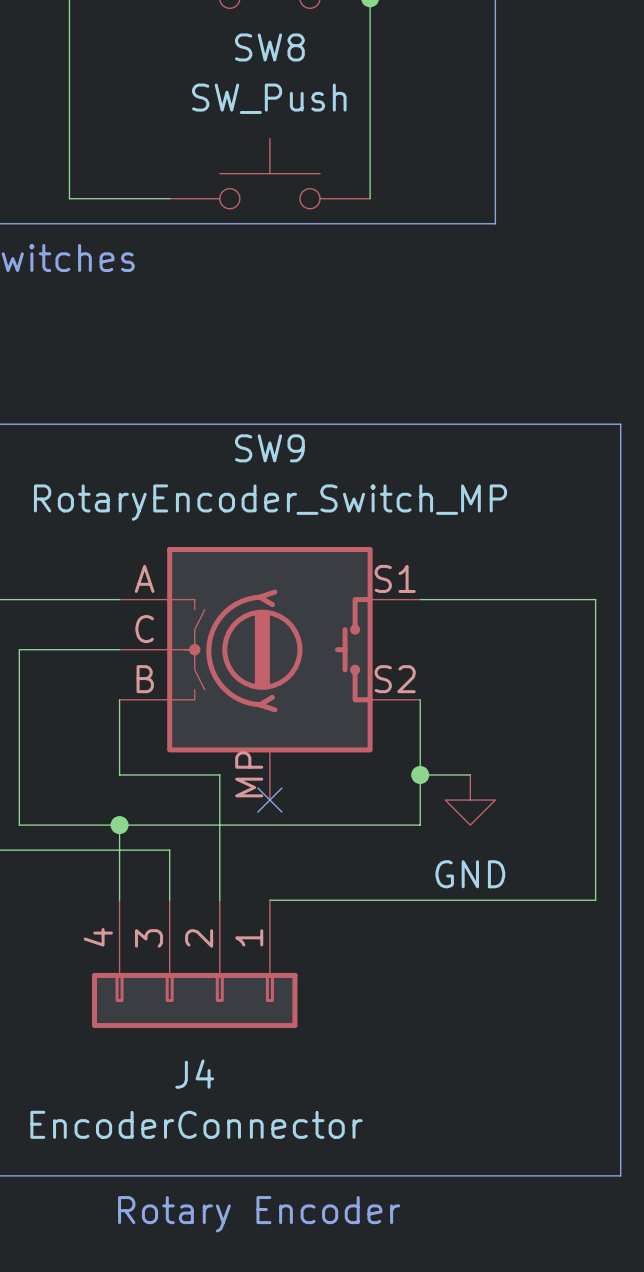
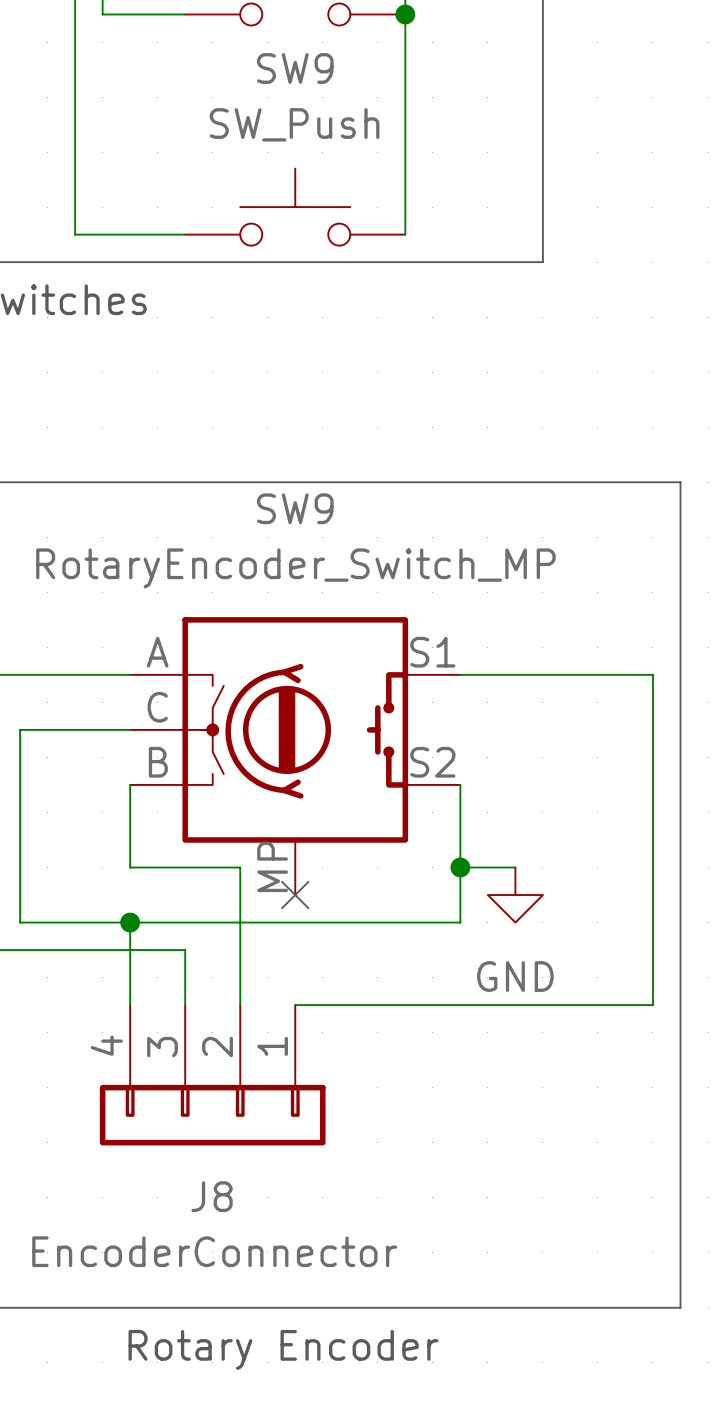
SW8 name: SW8 (269, 47) -> SW9 (295, 68)
J4 name: J4 (194, 1074) -> J8 (212, 1196)

